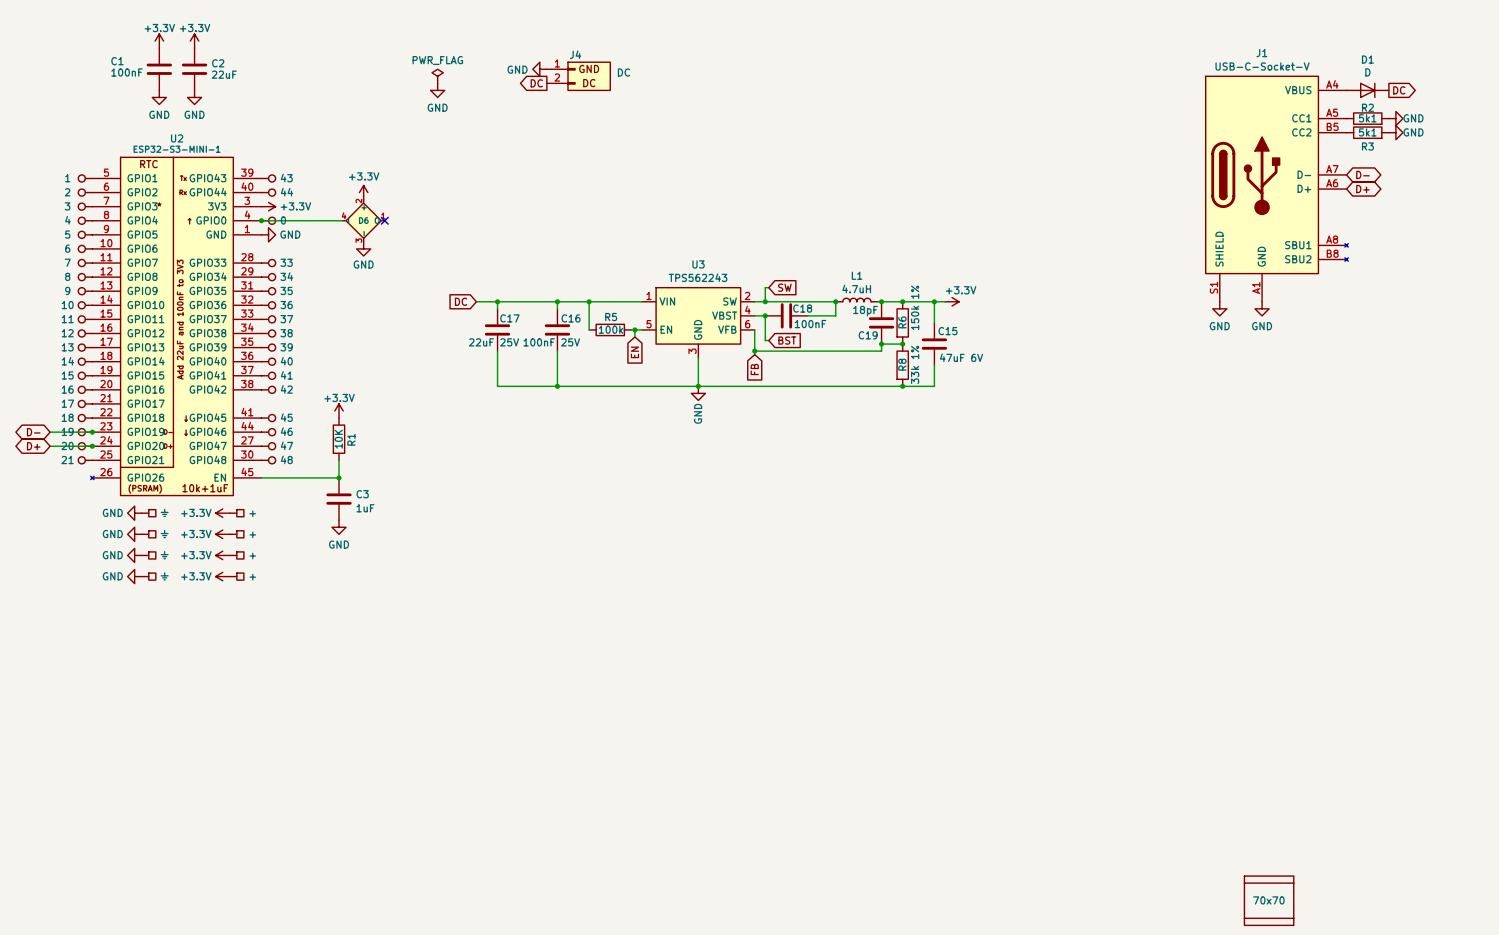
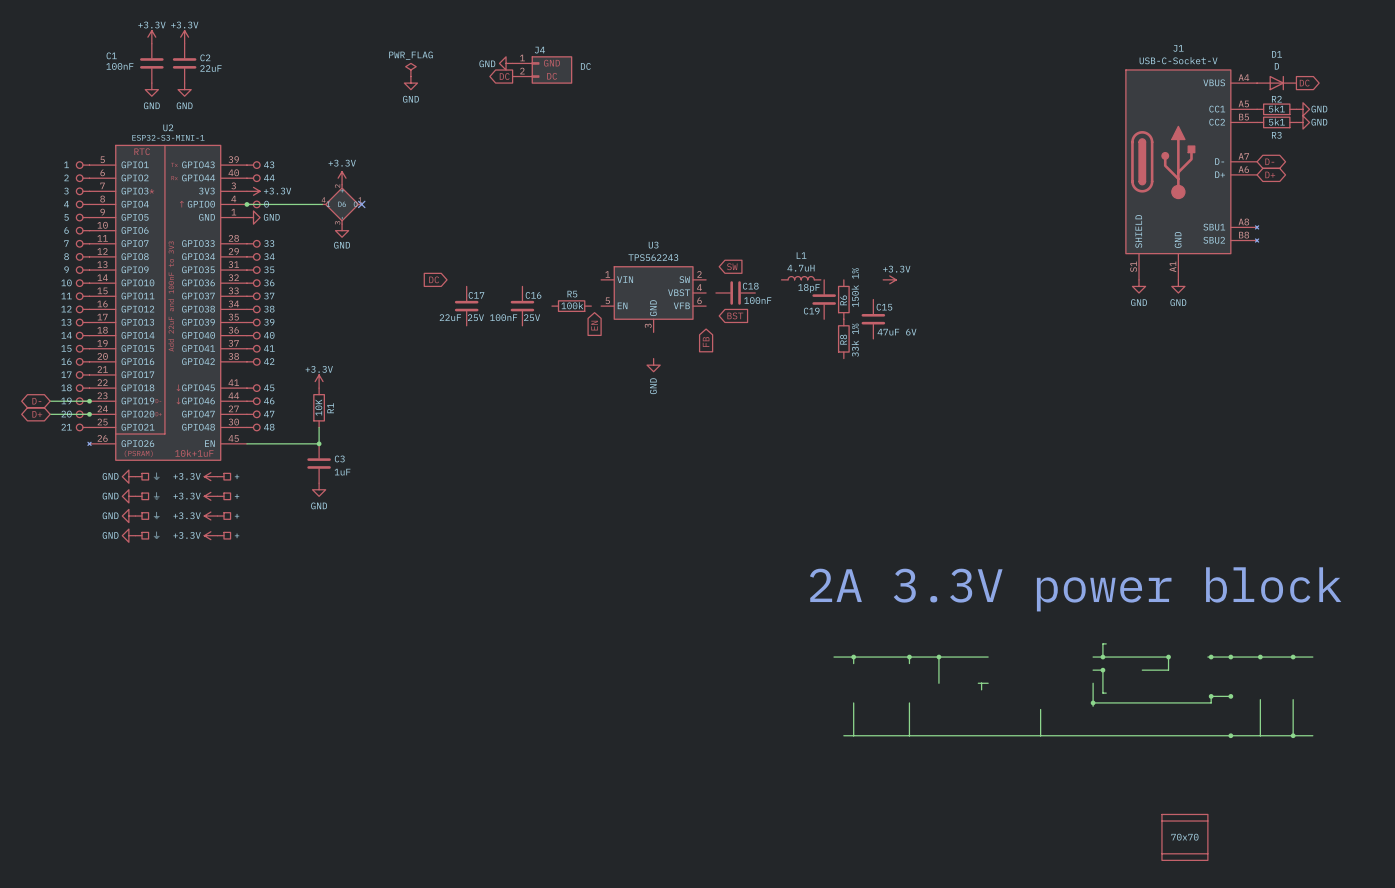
wire: (768, 287) (765, 287) (765, 301) -> none
wire: (476, 301) (641, 301) -> none
wire: (497, 301) (497, 308) -> none
junction: (497, 301) -> none
wire: (557, 301) (557, 308) -> none
junction: (557, 301) -> none
wire: (589, 301) (589, 329) -> none
junction: (589, 301) -> none
wire: (754, 301) (835, 301) (835, 315) (807, 315) -> none
junction: (765, 301) -> none
junction: (835, 301) -> none
wire: (878, 301) (944, 301) -> none
junction: (881, 301) -> none
junction: (902, 301) -> none
wire: (934, 301) (934, 322) -> none
junction: (934, 301) -> none
wire: (754, 315) (765, 315) (765, 340) (768, 340) -> none
junction: (765, 315) -> none
wire: (631, 329) (641, 329) -> none
wire: (634, 329) (634, 337) -> none
junction: (634, 329) -> none
wire: (754, 329) (754, 354) -> none
junction: (881, 344) -> none
wire: (902, 344) (881, 344) (881, 351) (754, 351) -> none
junction: (902, 344) -> none
wire: (497, 351) (497, 386) (934, 386) (934, 365) -> none
wire: (557, 351) (557, 386) -> none
junction: (754, 351) -> none
wire: (698, 358) (698, 386) -> none
junction: (557, 386) -> none
junction: (698, 386) -> none
junction: (902, 386) -> none
text: none -> 2A 3.3V power block (1075, 589)
wire: none -> (1106, 643) (1102, 643) (1102, 657)
wire: none -> (834, 657) (988, 657)
wire: none -> (853, 657) (853, 663)
junction: none -> (853, 657)
wire: none -> (909, 657) (909, 663)
junction: none -> (909, 657)
wire: none -> (938, 657) (938, 683)
junction: none -> (938, 657)
wire: none -> (1093, 657) (1168, 657) (1168, 670) (1142, 670)
junction: none -> (1102, 657)
junction: none -> (1168, 657)
wire: none -> (1207, 657) (1312, 657)
junction: none -> (1211, 657)
junction: none -> (1230, 657)
junction: none -> (1260, 657)
junction: none -> (1293, 657)
wire: none -> (1093, 670) (1102, 670) (1102, 693) (1106, 693)
junction: none -> (1102, 670)
wire: none -> (978, 683) (988, 683)
wire: none -> (981, 683) (981, 689)
wire: none -> (1093, 683) (1093, 706)
junction: none -> (1211, 696)
wire: none -> (1230, 696) (1211, 696) (1211, 702) (1093, 702)
junction: none -> (1230, 696)
wire: none -> (1260, 699) (1260, 735)
wire: none -> (1293, 699) (1293, 735)
wire: none -> (853, 702) (853, 735)
wire: none -> (909, 702) (909, 735)
junction: none -> (1093, 702)
wire: none -> (1040, 709) (1040, 735)
wire: none -> (843, 735) (1312, 735)
junction: none -> (1230, 735)
junction: none -> (1293, 735)

